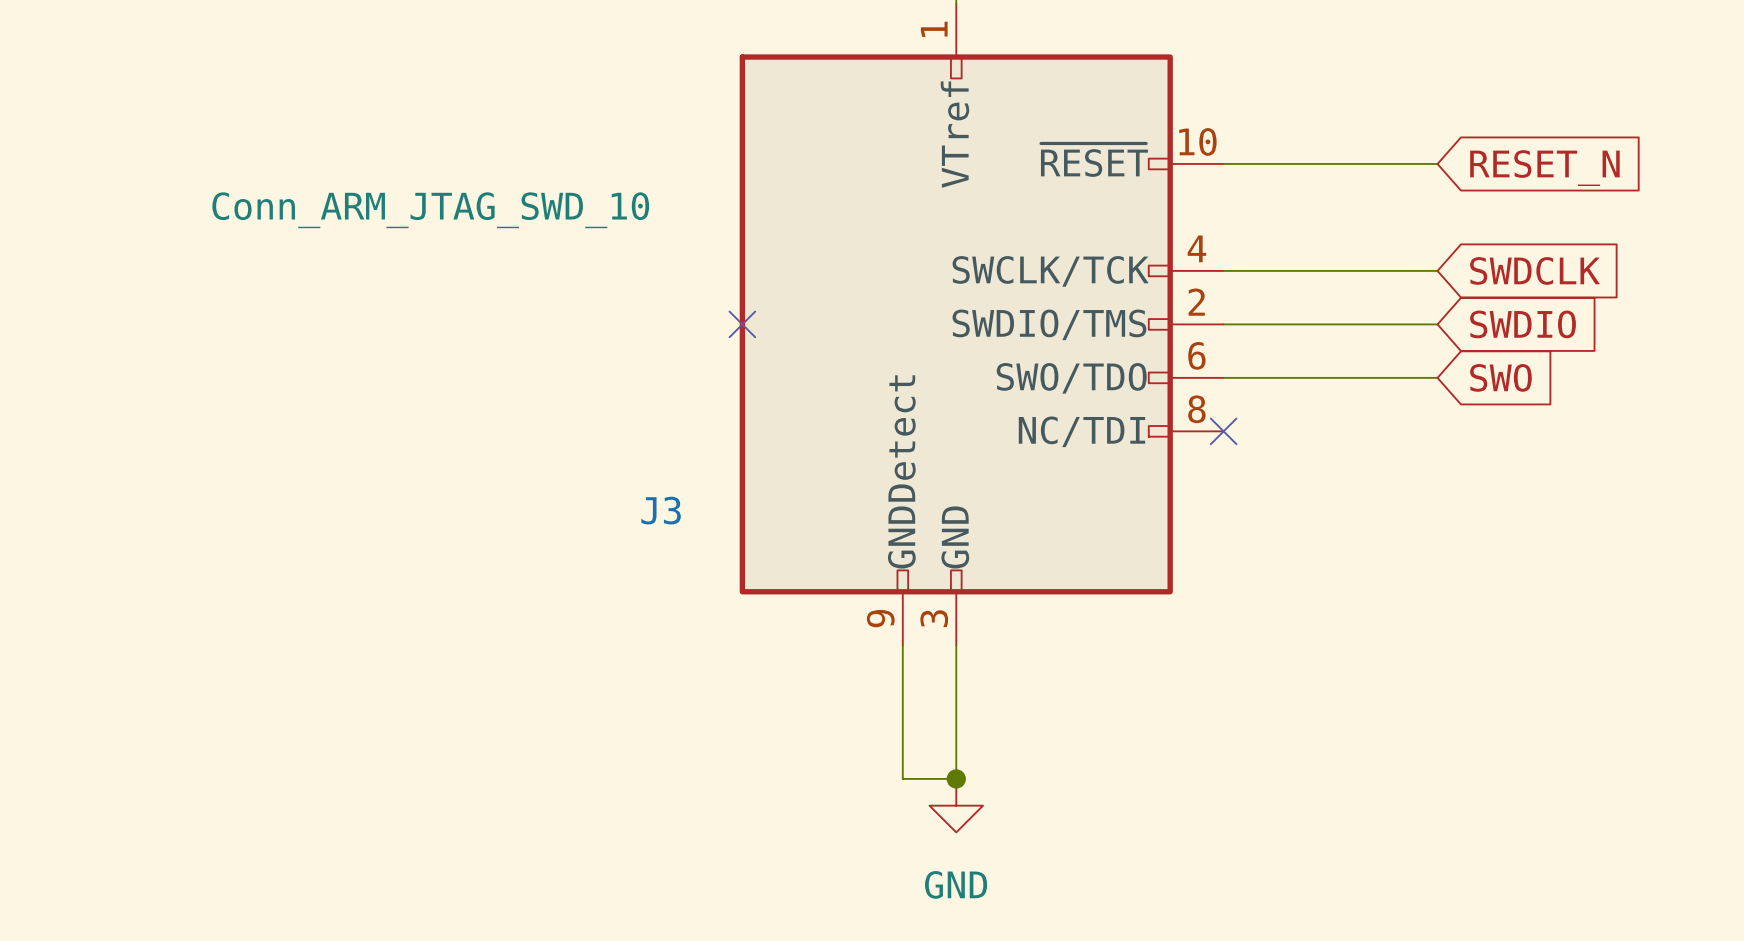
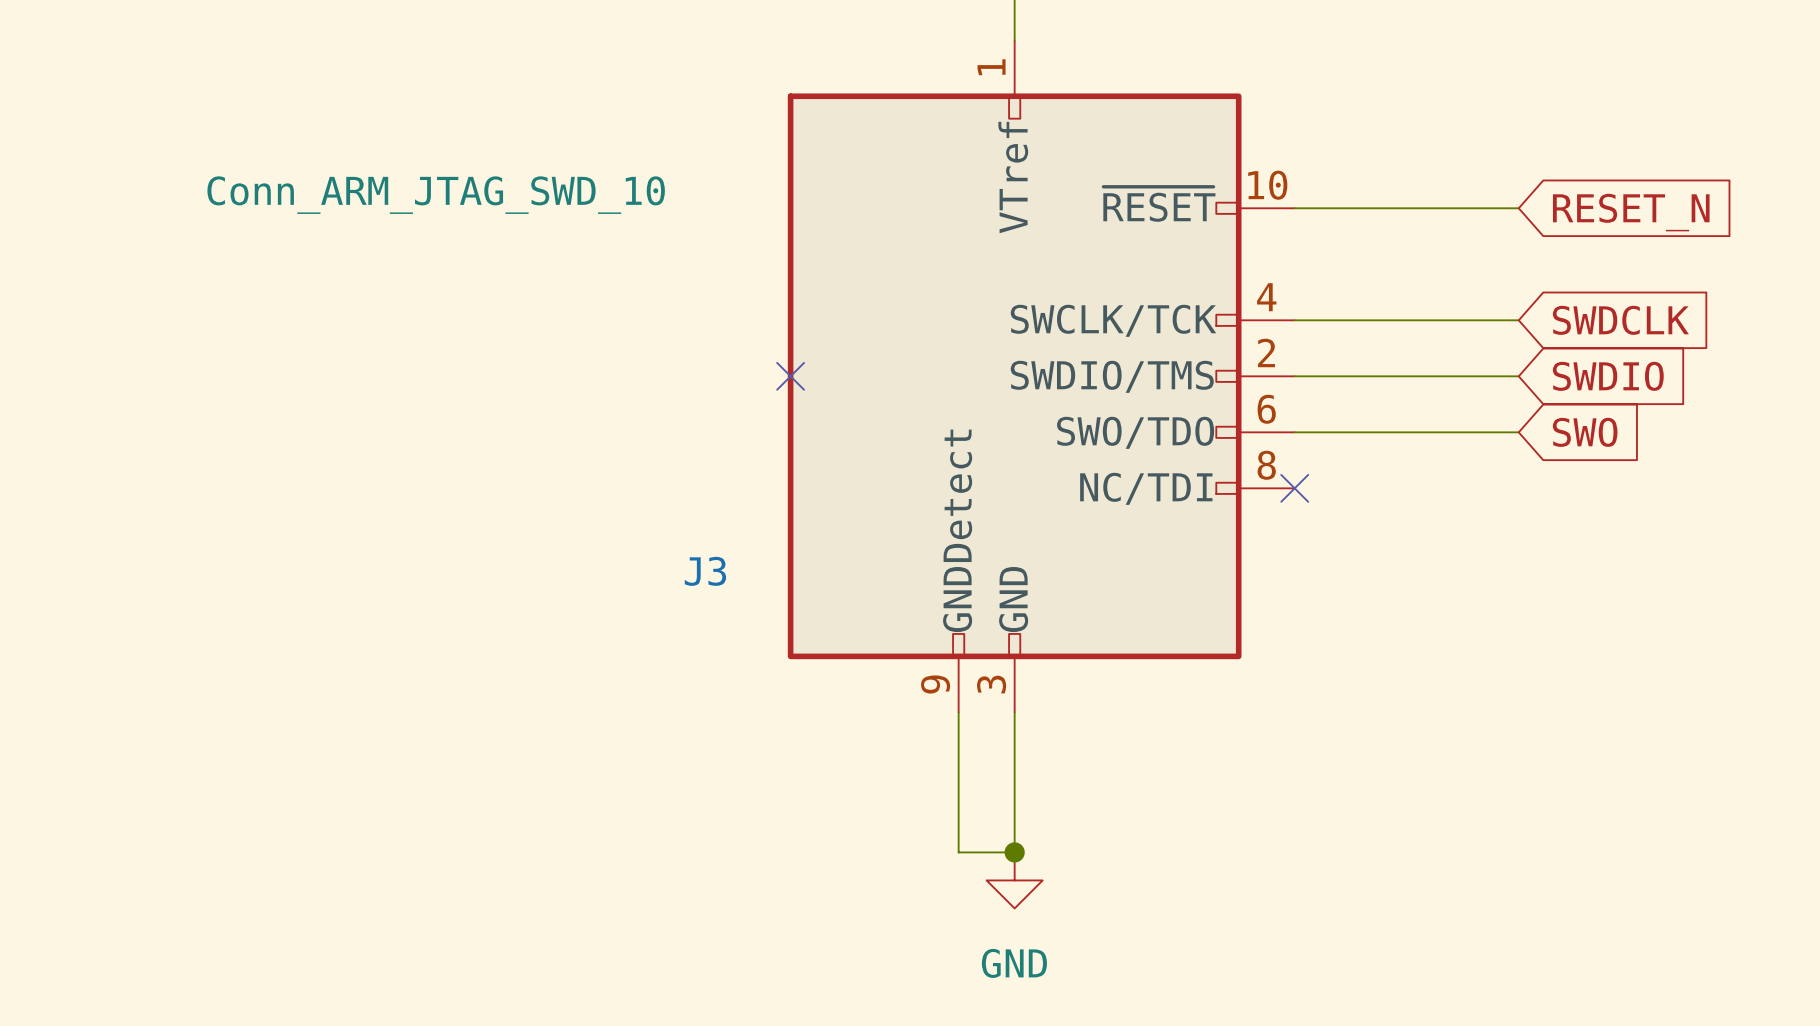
J3 value position: Conn_ARM_JTAG_SWD_10 (430, 210) -> Conn_ARM_JTAG_SWD_10 (436, 195)

